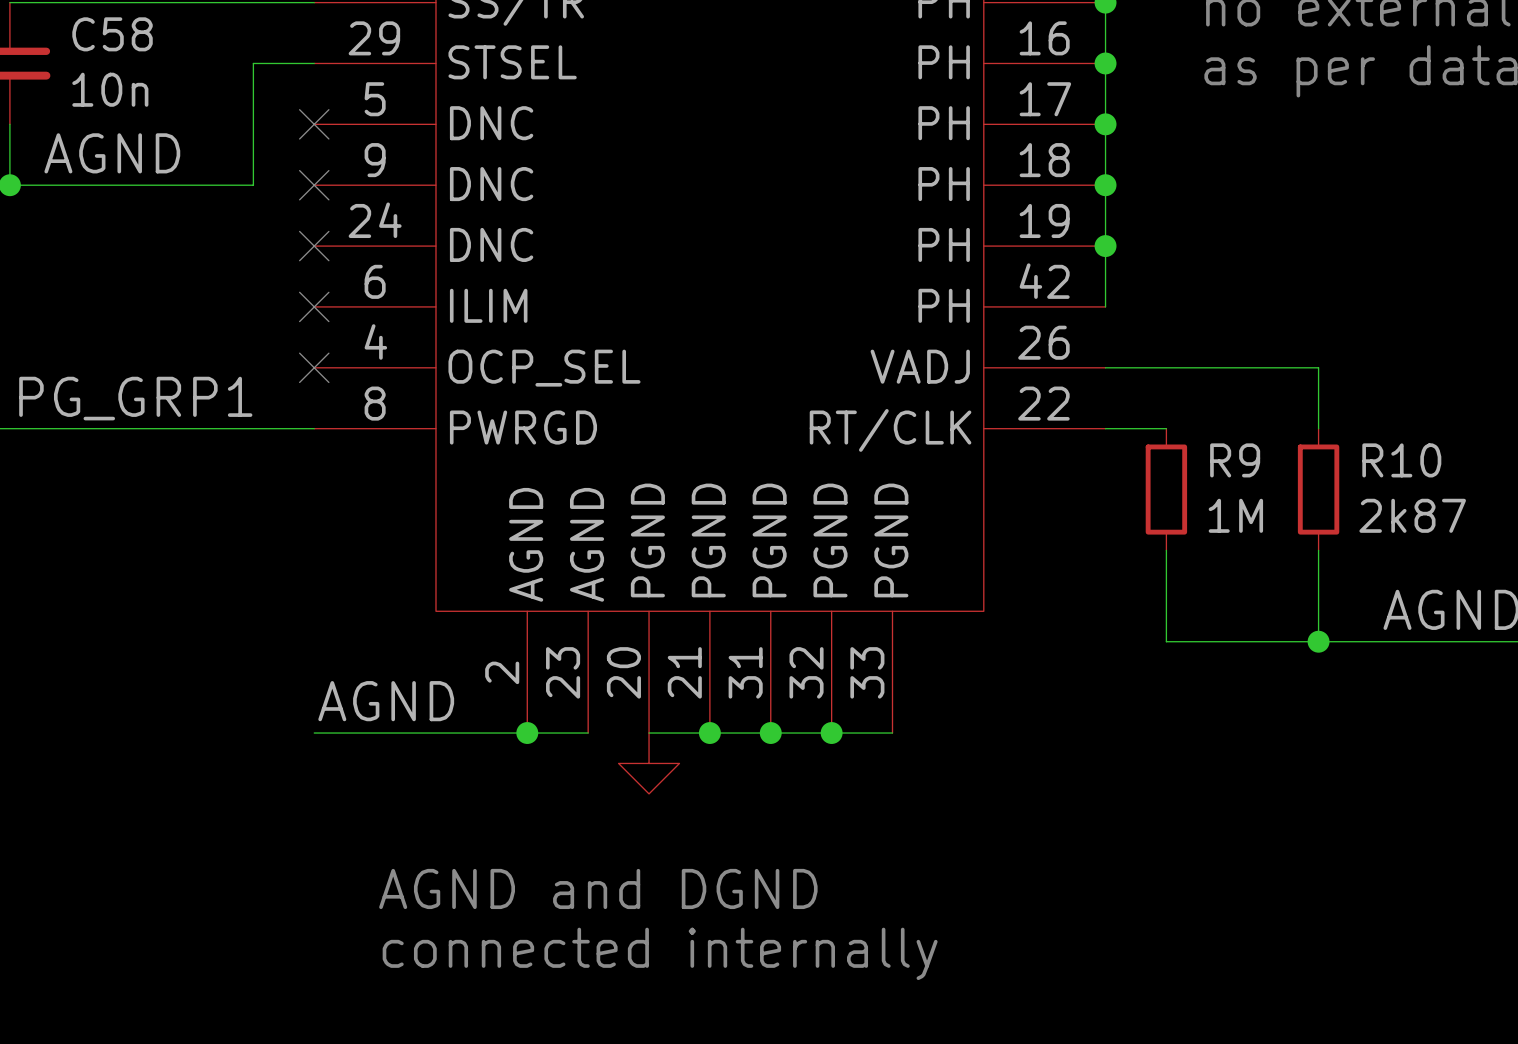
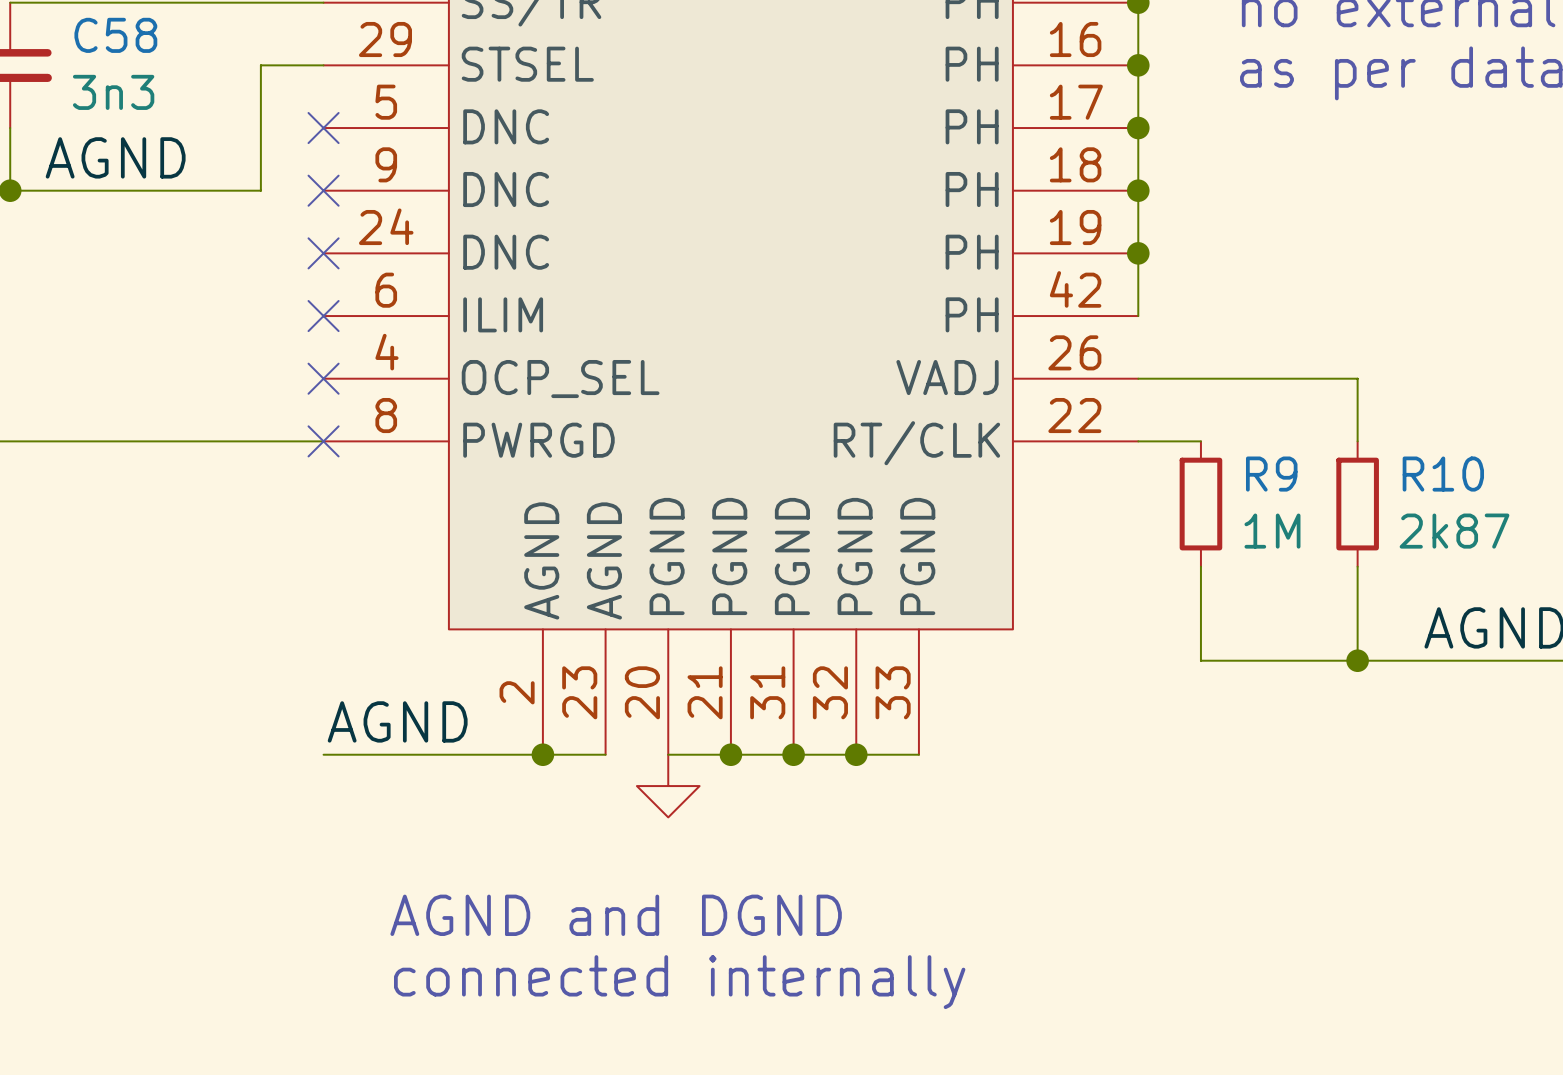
C58 value: 10n (110, 89) -> 3n3 (113, 92)
label: PG_GRP1 (135, 398) -> none
no-connect mark: none -> (323, 441)

